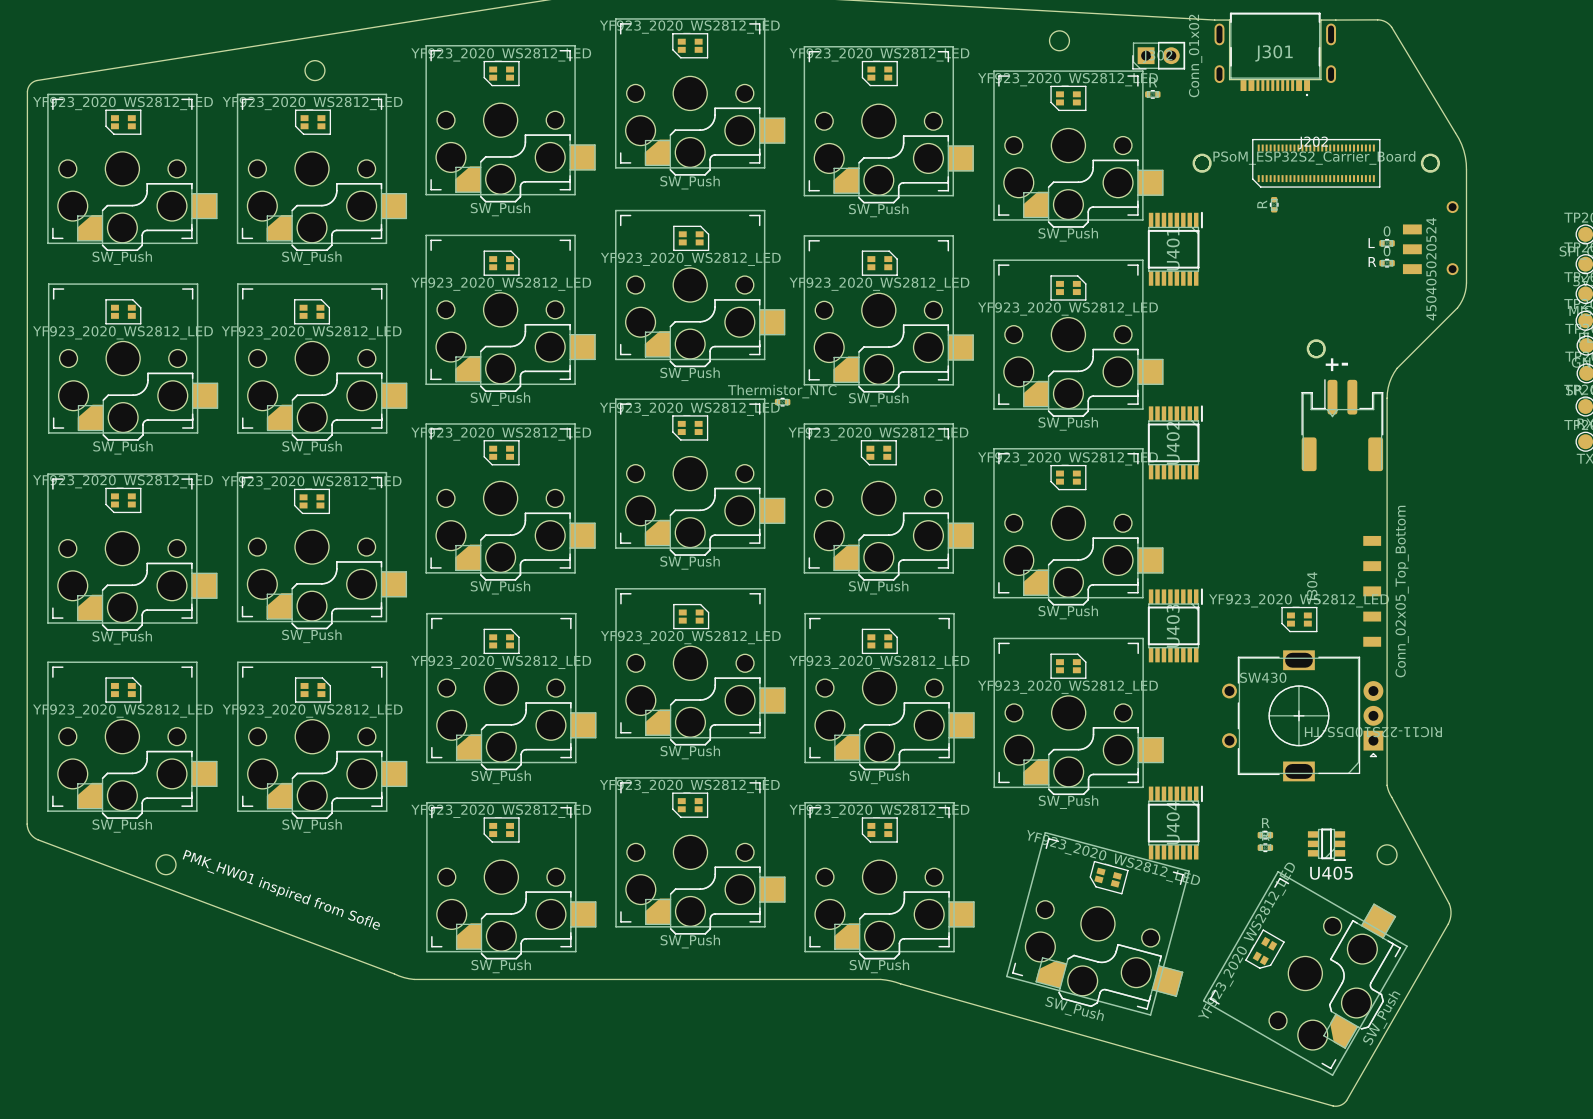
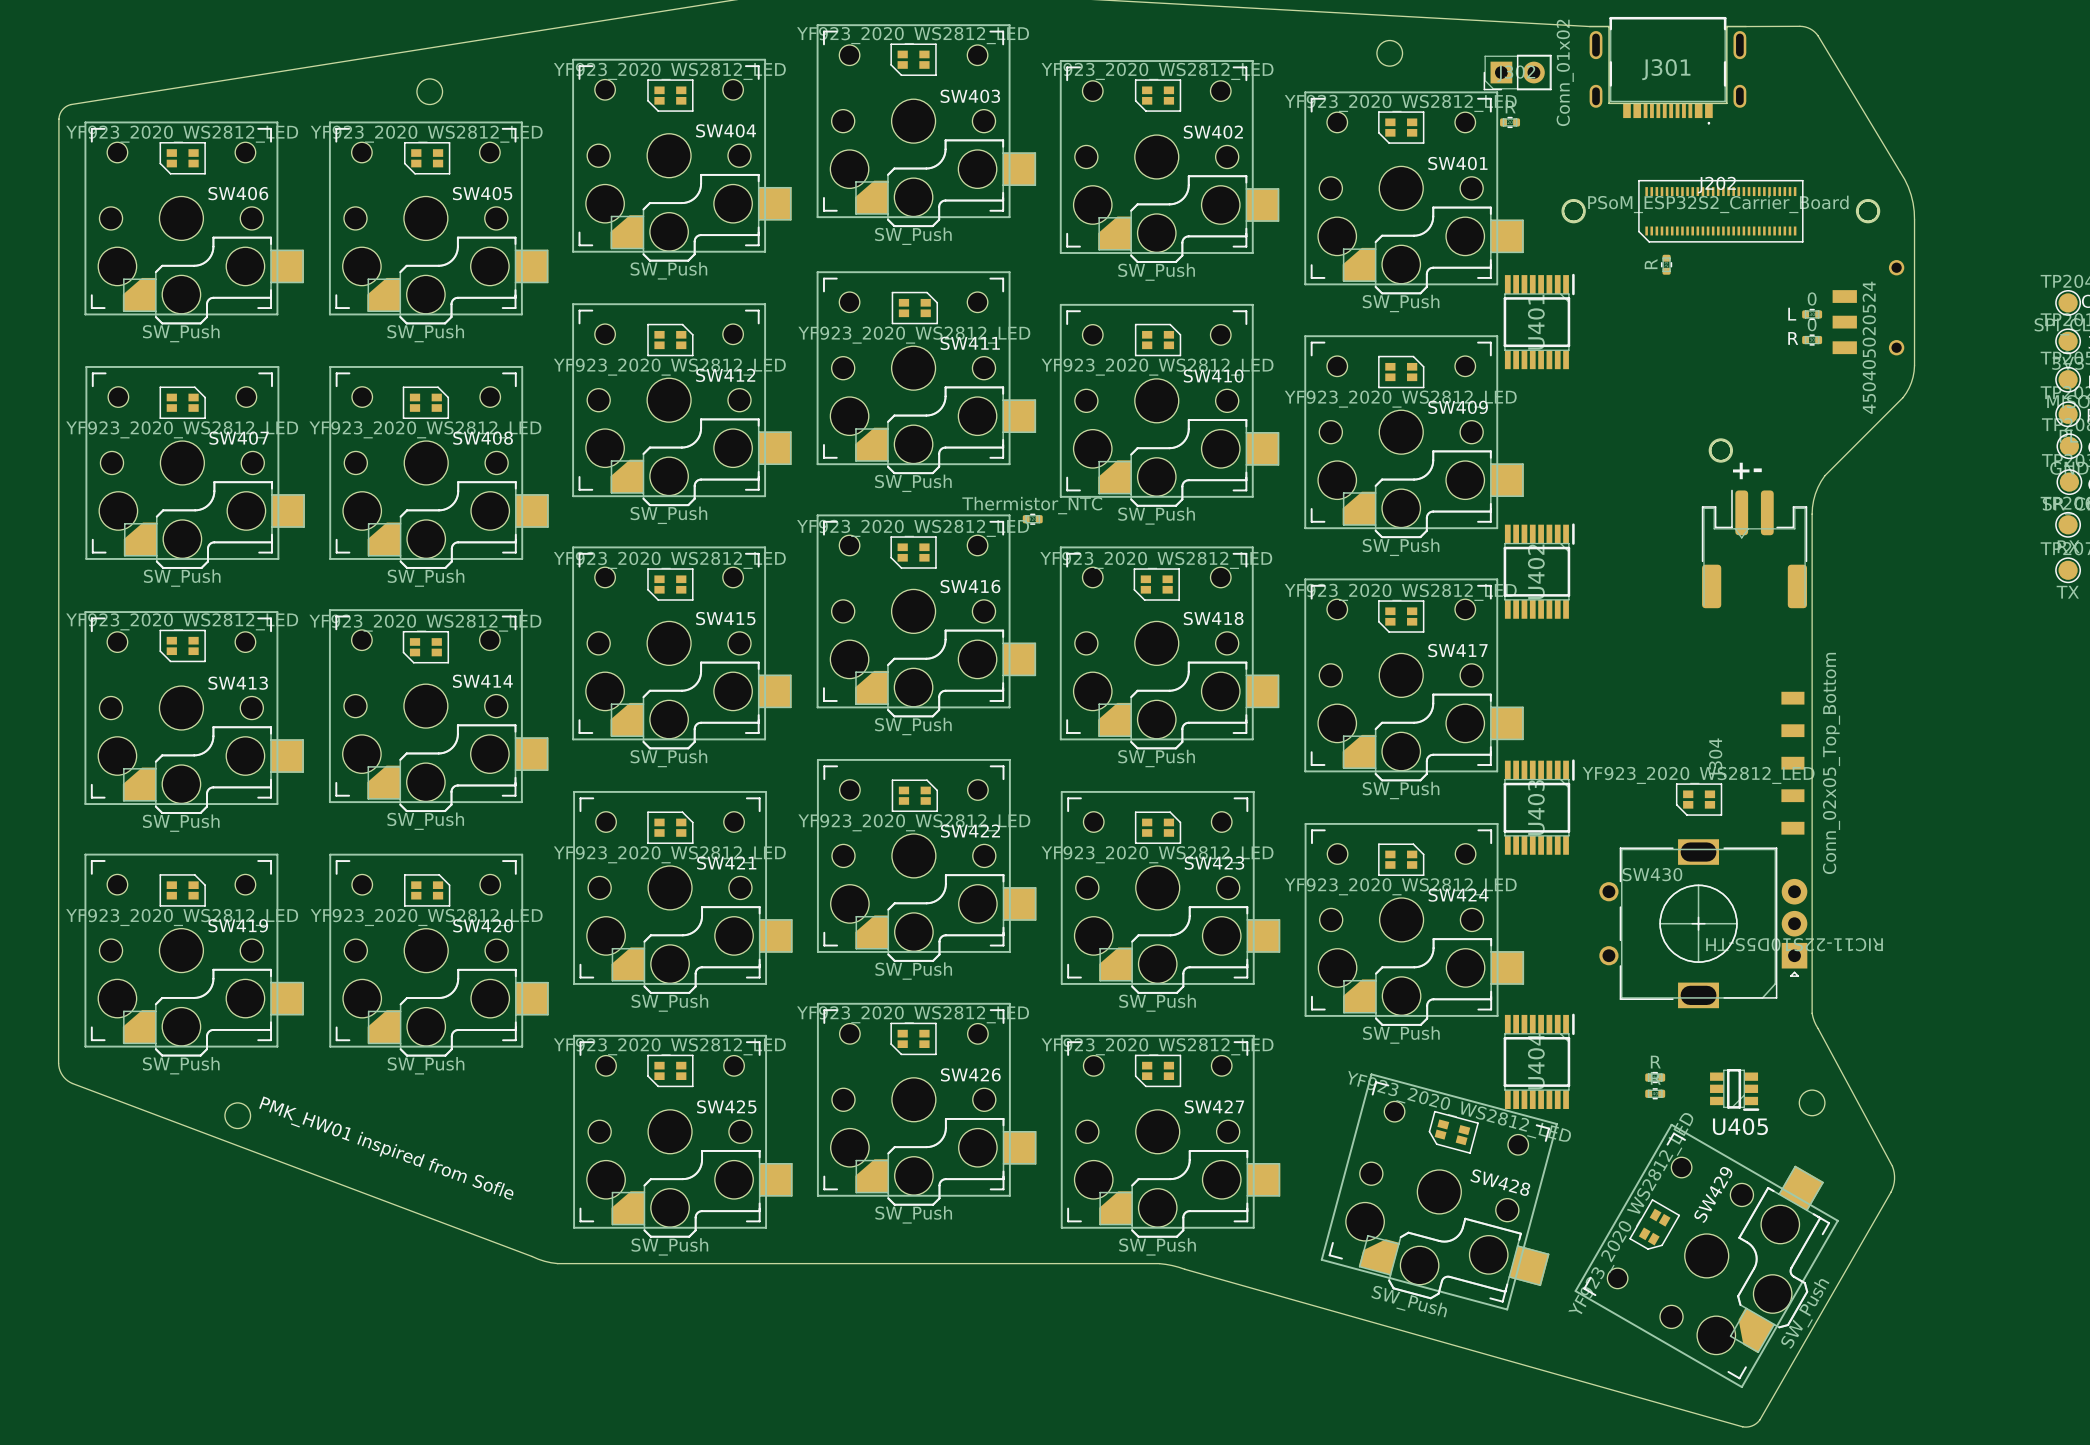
SW403: none -> SW_Push (926, 125)
SW404: none -> SW_Push (681, 160)
SW402: none -> SW_Push (1169, 161)
SW401: none -> SW_Push (1414, 192)
SW406: none -> SW_Push (194, 222)
SW405: none -> SW_Push (438, 222)
SW411: none -> SW_Push (926, 372)
SW412: none -> SW_Push (681, 404)
SW410: none -> SW_Push (1169, 405)
SW409: none -> SW_Push (1414, 436)
SW407: none -> SW_Push (195, 467)
SW408: none -> SW_Push (439, 467)
SW416: none -> SW_Push (926, 615)
SW415: none -> SW_Push (681, 647)
SW418: none -> SW_Push (1169, 647)
SW417: none -> SW_Push (1414, 679)
SW414: none -> SW_Push (438, 710)
SW413: none -> SW_Push (194, 712)
SW422: none -> SW_Push (926, 860)
SW421: none -> SW_Push (682, 892)
SW423: none -> SW_Push (1170, 892)
SW424: none -> SW_Push (1414, 924)
SW419: none -> SW_Push (194, 955)
SW420: none -> SW_Push (439, 955)
SW426: none -> SW_Push (926, 1104)
SW425: none -> SW_Push (682, 1136)
SW427: none -> SW_Push (1170, 1136)
SW428: none -> SW_Push (1439, 1191)
SW429: none -> SW_Push (1706, 1255)

